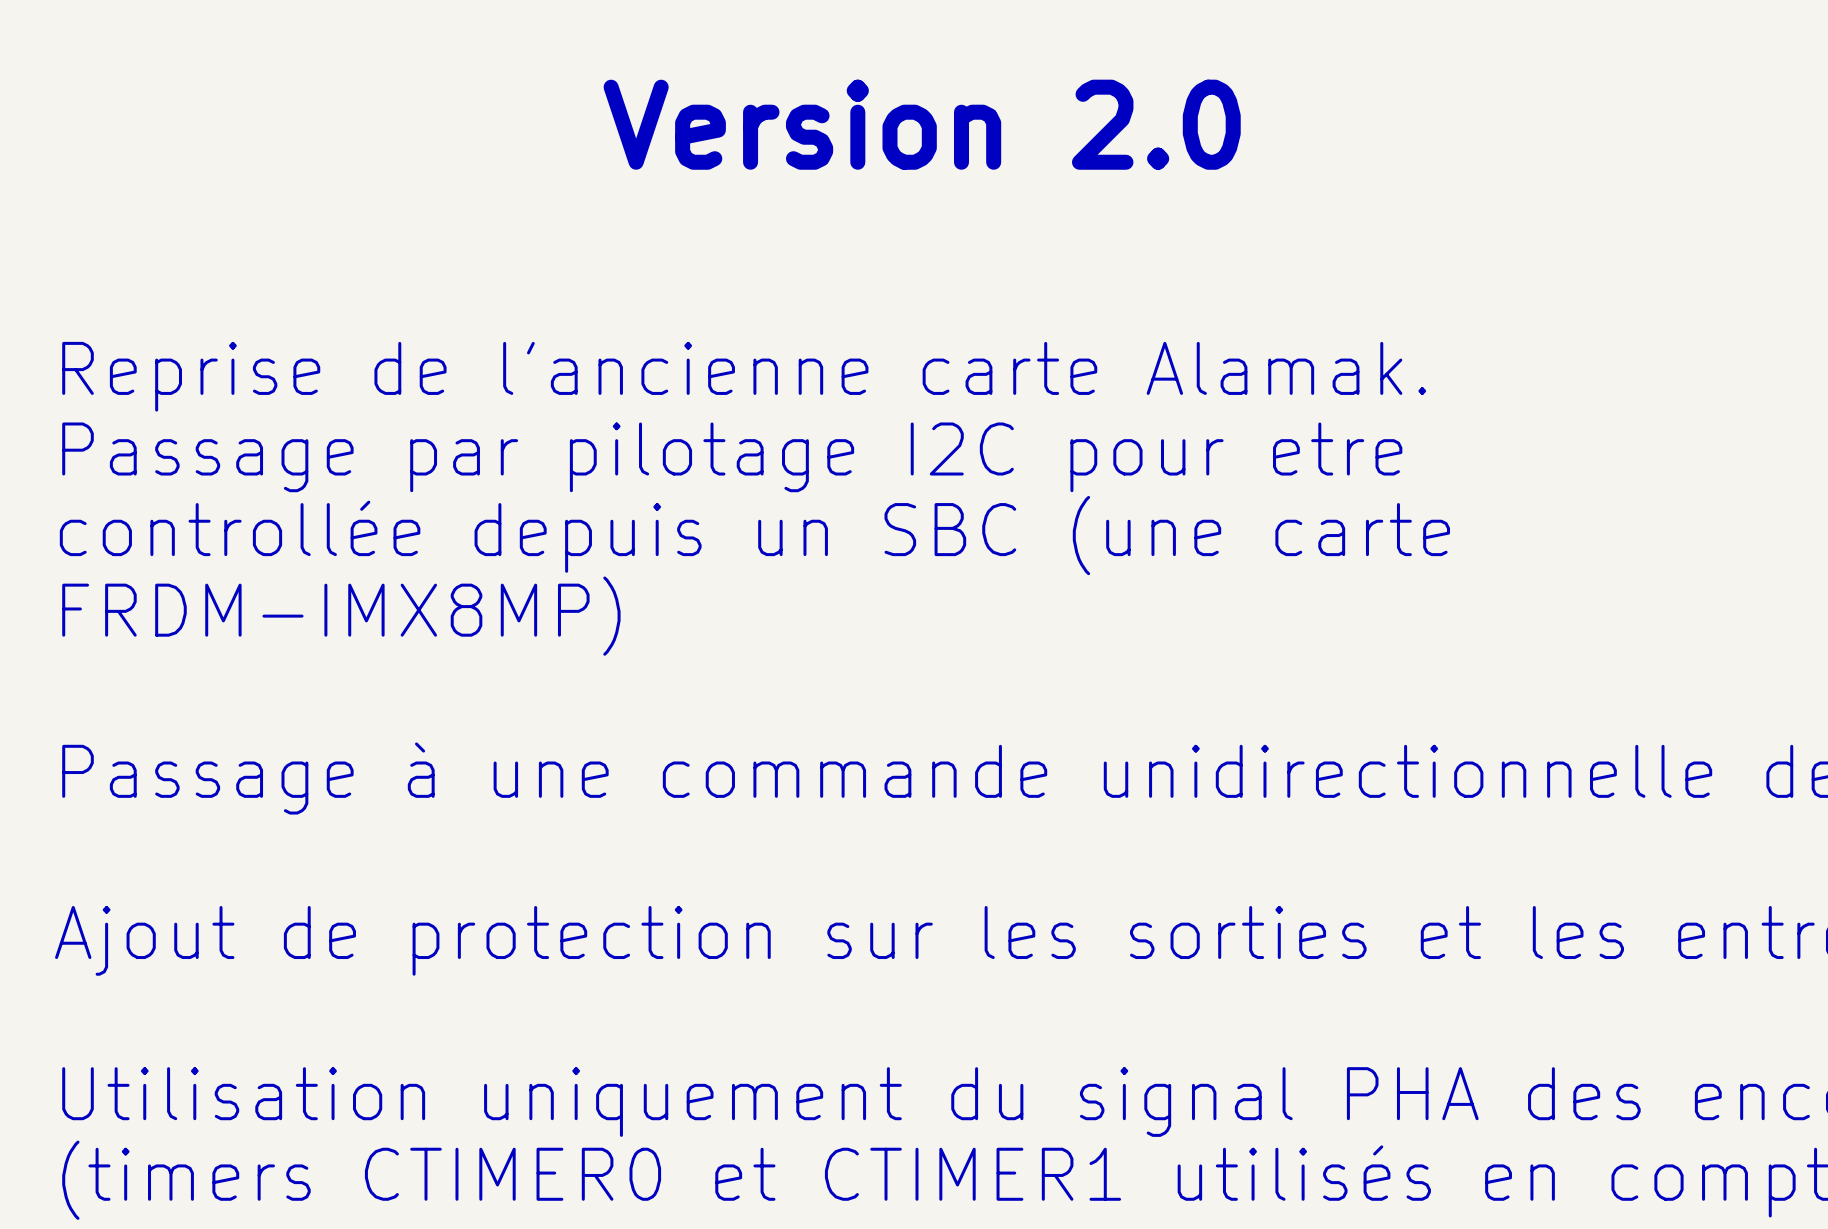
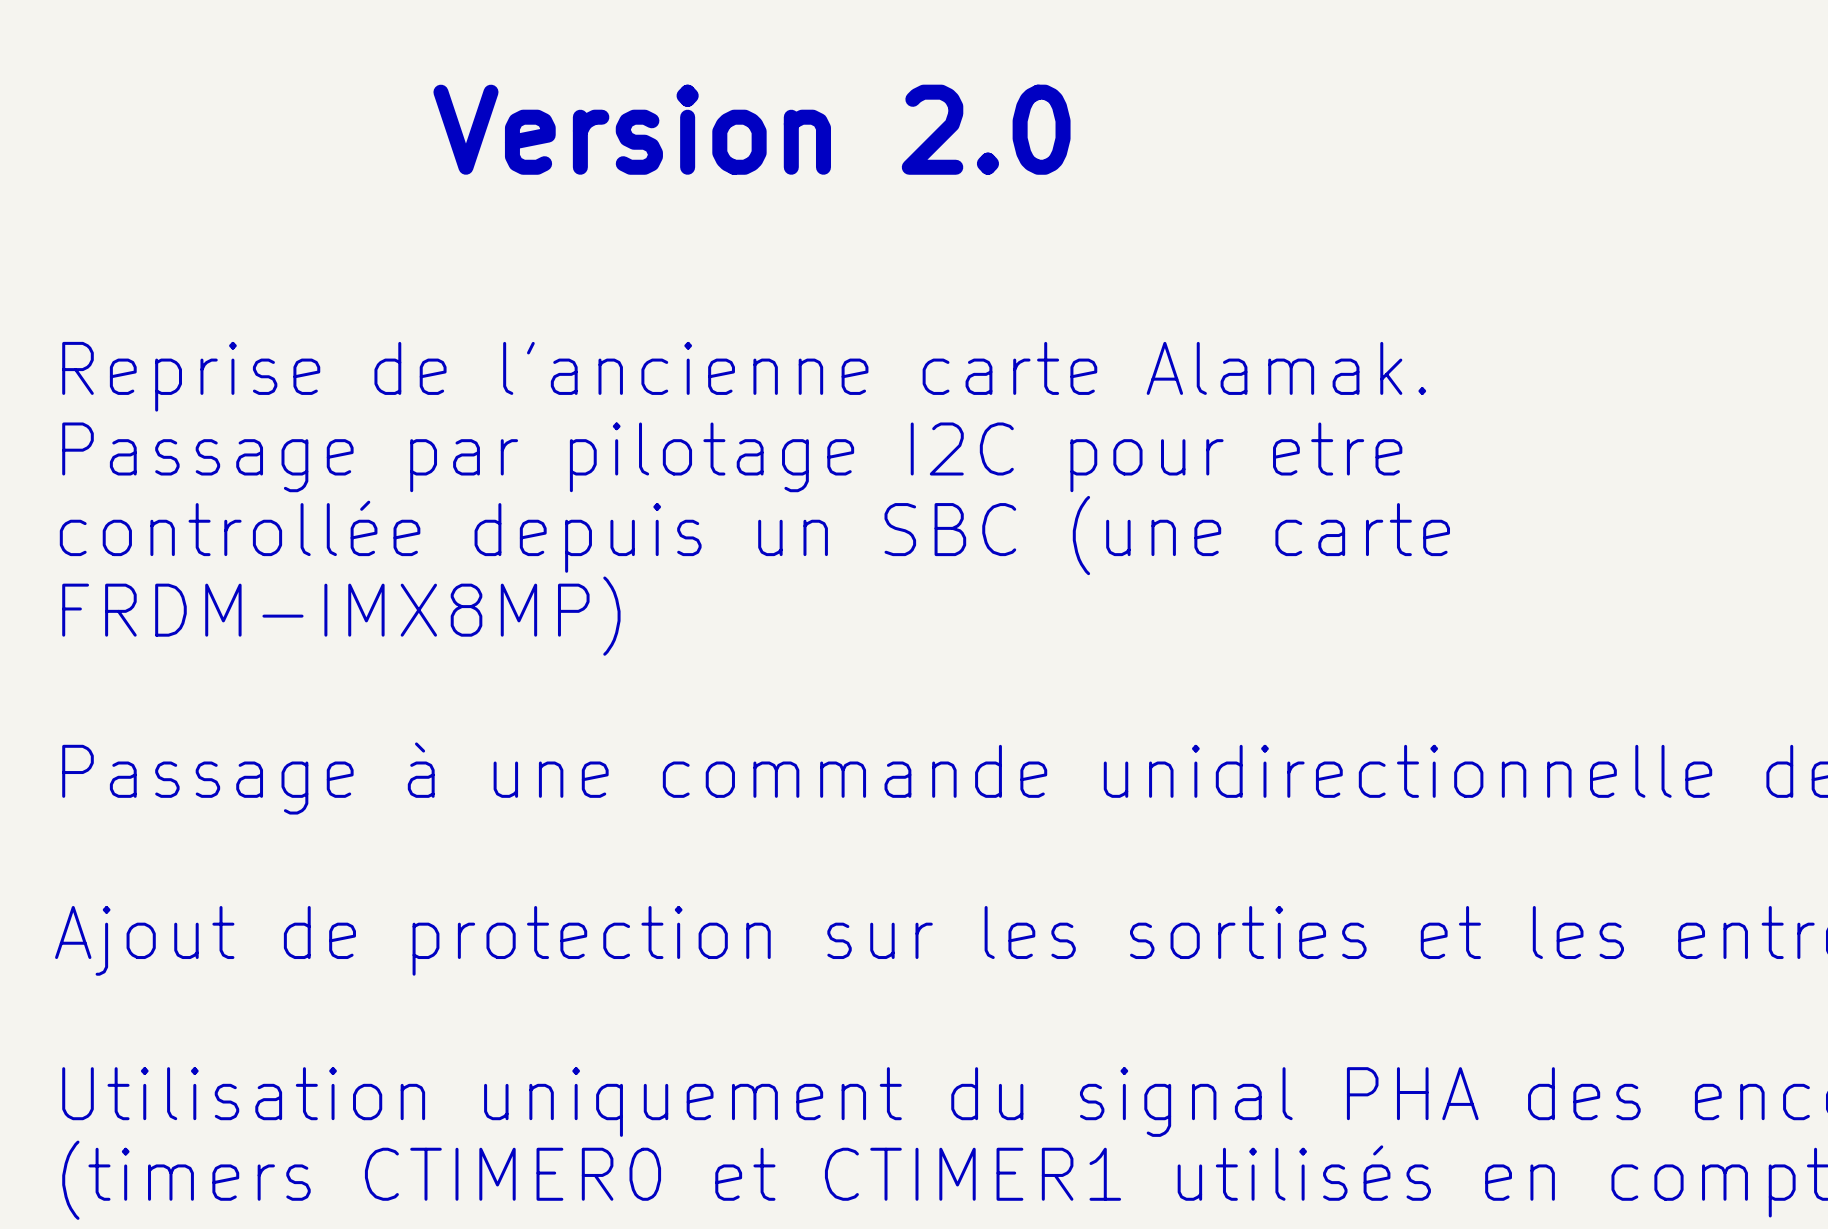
text position: Version 2.0 (922, 124) -> Version 2.0 (751, 129)

